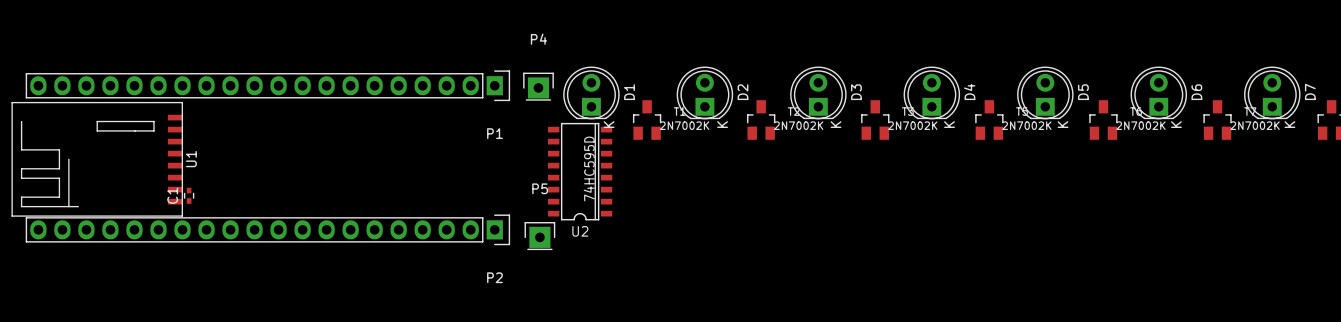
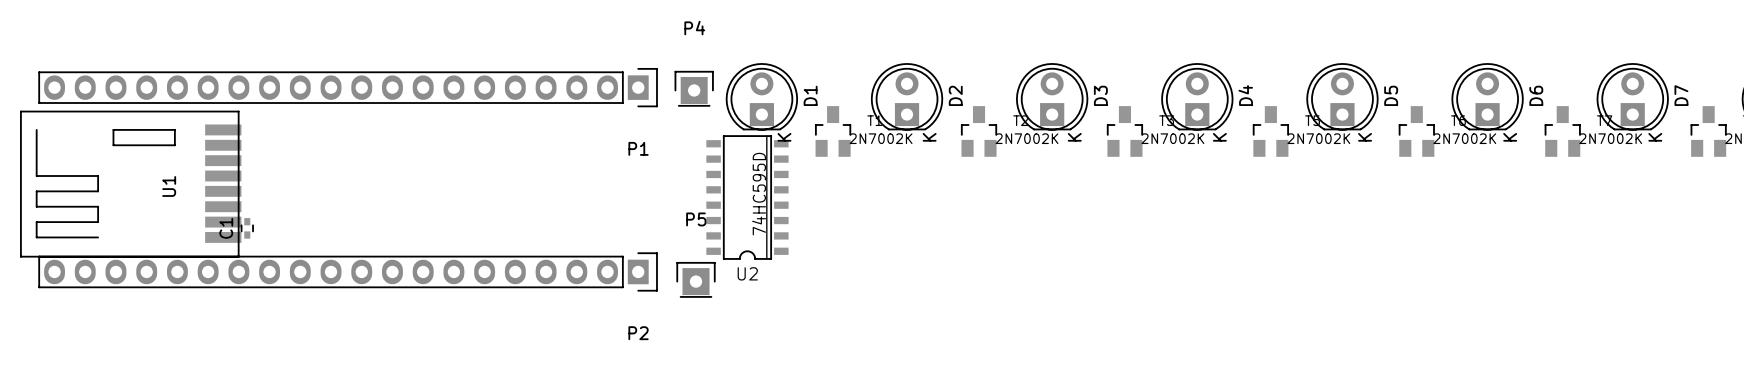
U1 footprint: [12, 102, 183, 217] -> [20, 110, 242, 258]
U1 name position: U1 (191, 159) -> U1 (169, 186)

